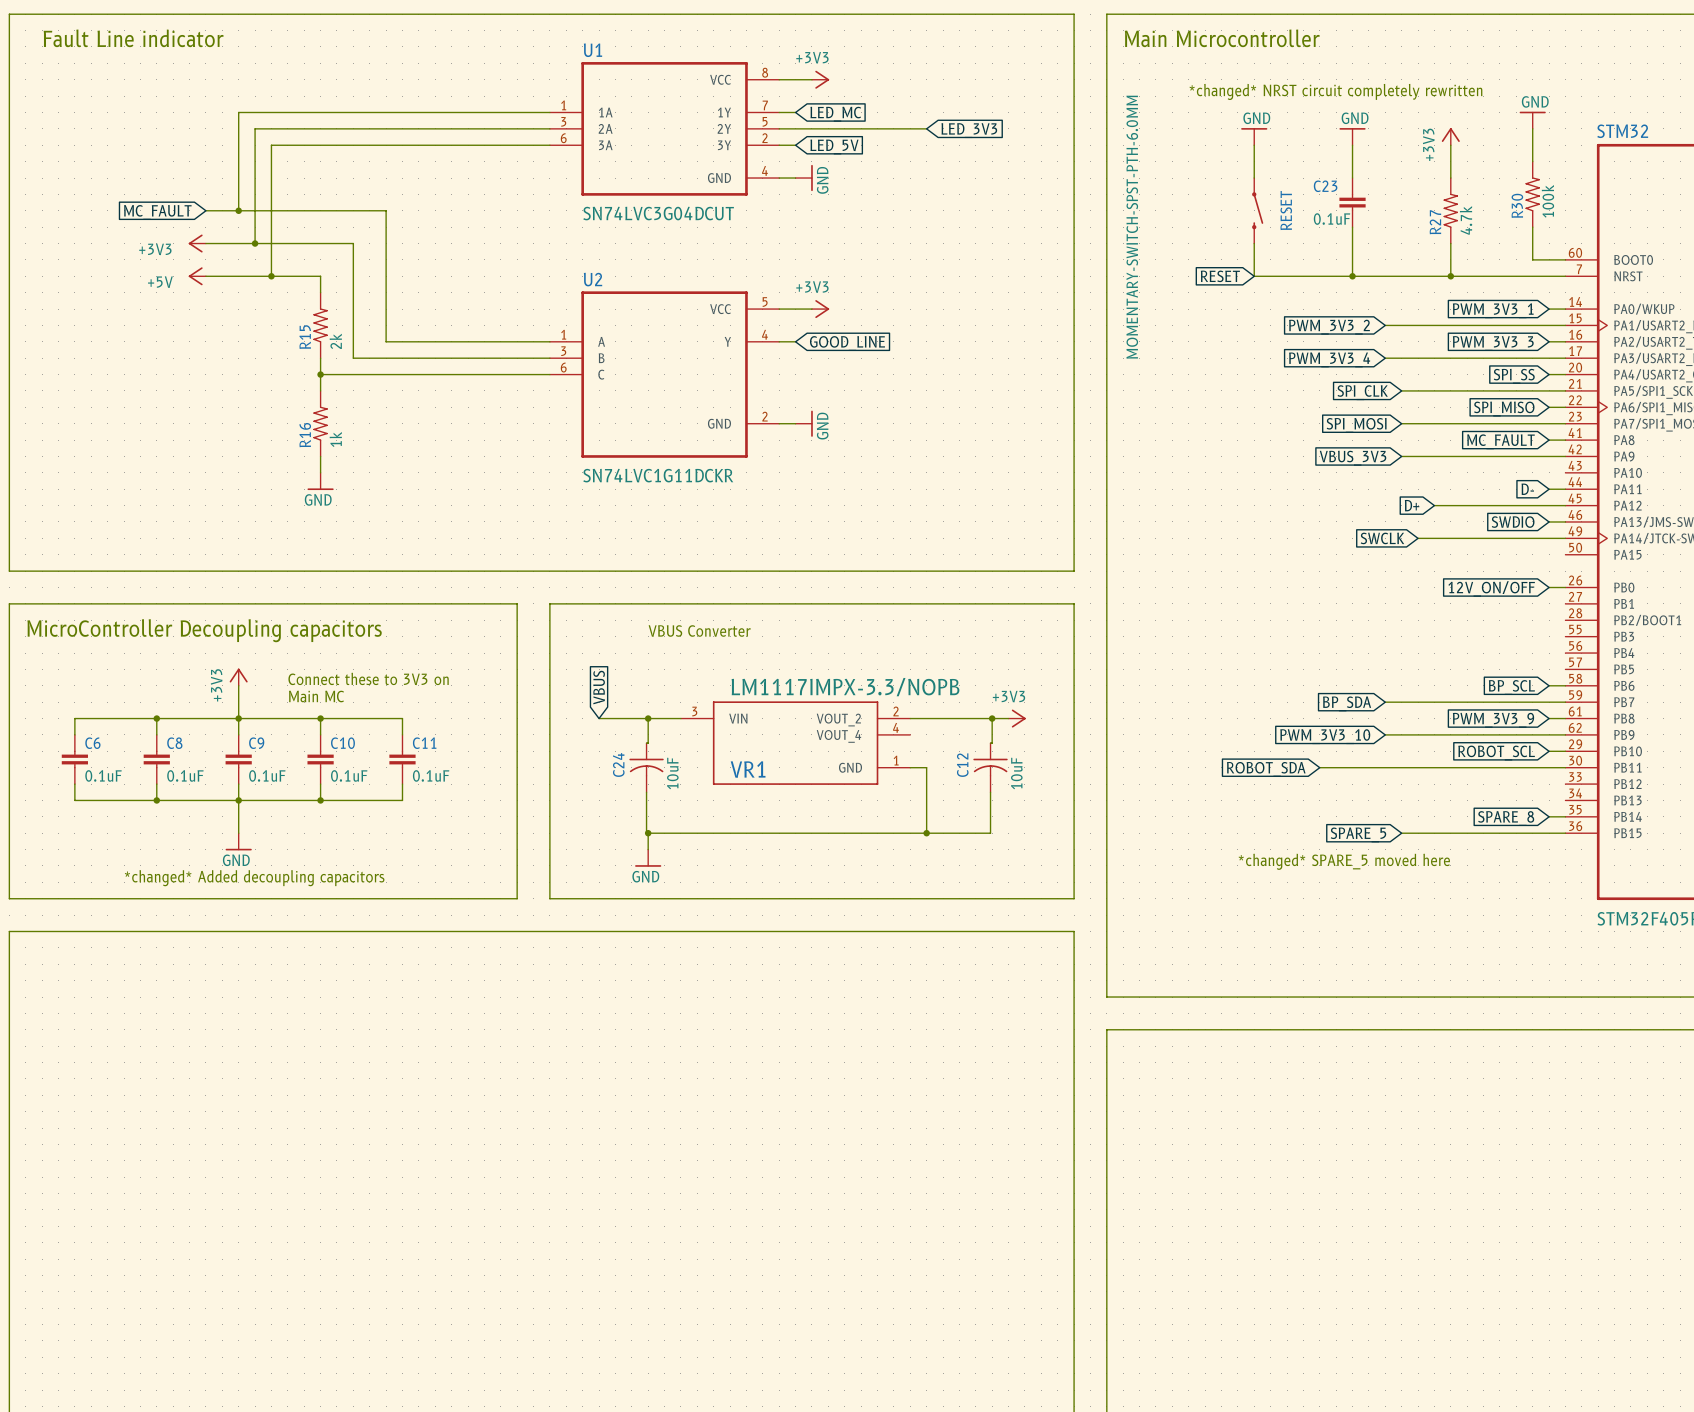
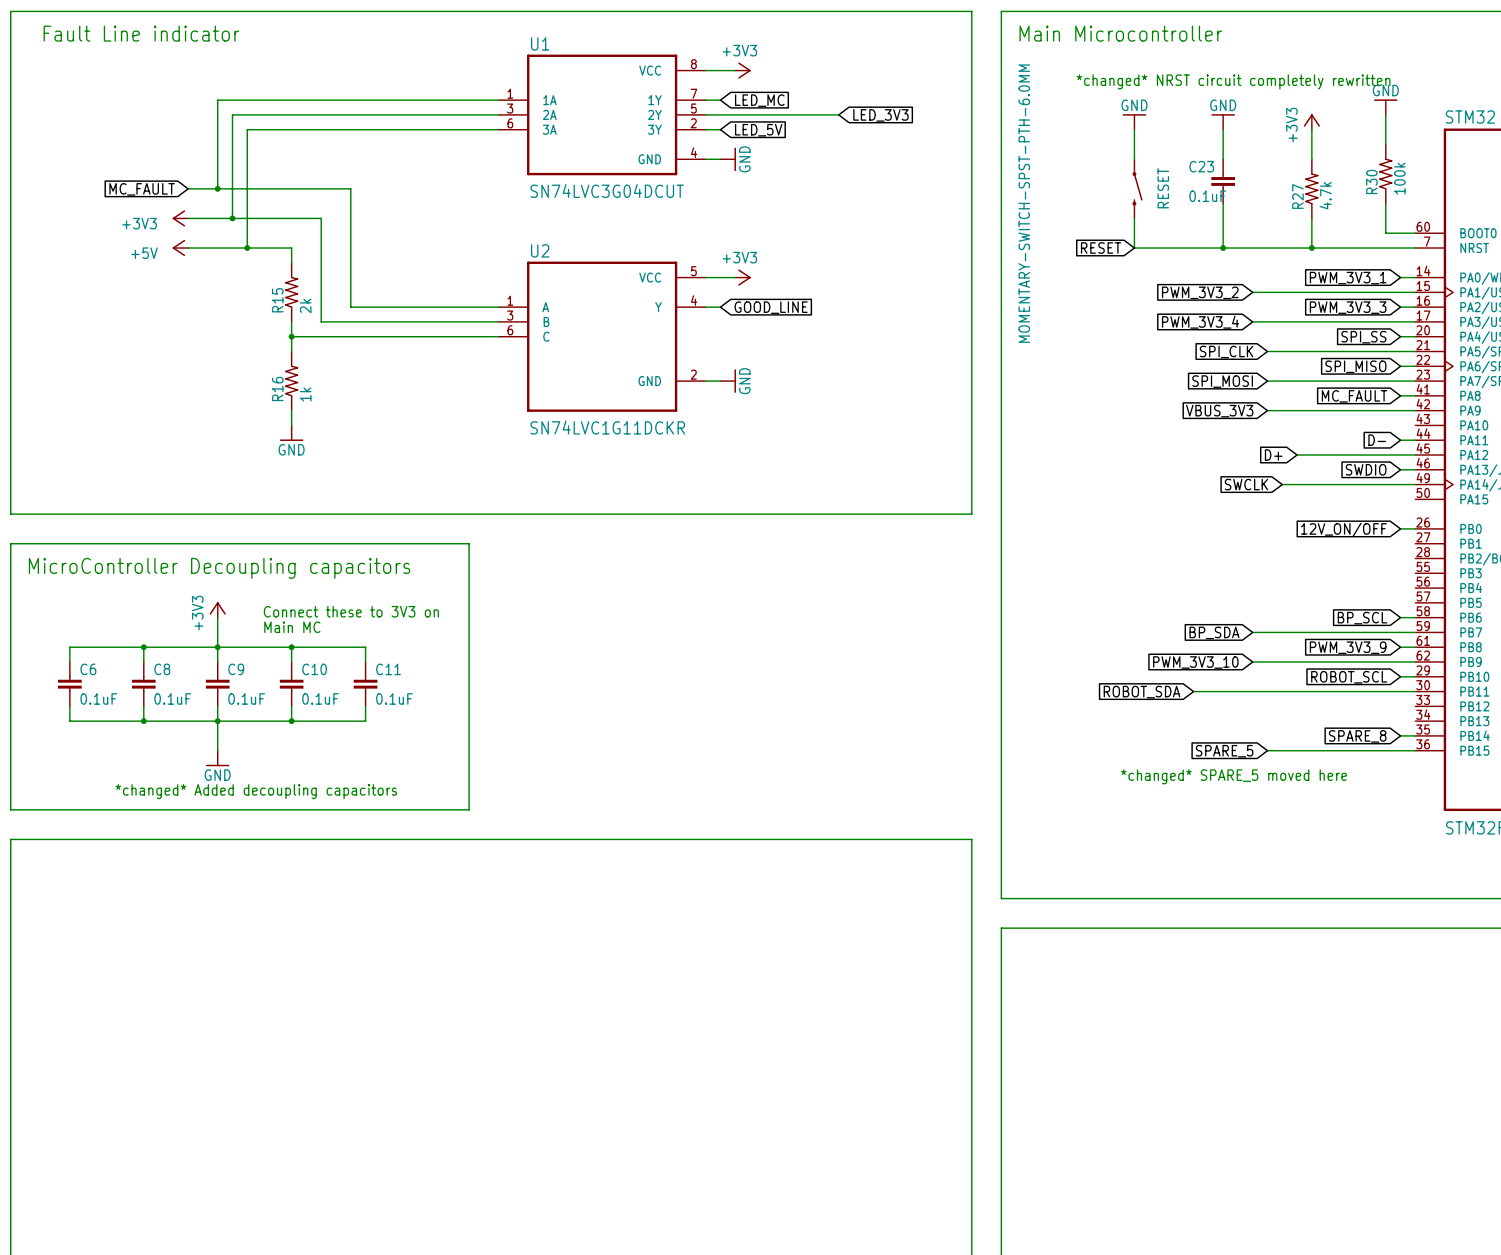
wire: (549, 603) (1074, 603) (1074, 898) (549, 898) (549, 603) -> none
text: VBUS Converter (699, 630) -> none
global label: VBUS (599, 687) -> none
wire: (599, 718) (680, 718) -> none
wire: (648, 718) (648, 743) (646, 743) -> none
junction: (648, 718) -> none
wire: (910, 718) (1008, 718) -> none
wire: (992, 718) (992, 743) (990, 743) -> none
junction: (992, 718) -> none
power symbol: +3V3 (1017, 718) -> none
VR1: LM1117IMPX-3.3/NOPB (795, 743) -> none
C24: 10uF (646, 767) -> none
wire: (910, 767) (926, 767) (926, 833) -> none
C12: 10uF (990, 767) -> none
wire: (646, 792) (646, 833) (990, 833) (990, 792) -> none
wire: (648, 833) (648, 849) -> none
junction: (648, 833) -> none
junction: (926, 833) -> none
power symbol: GND (648, 858) -> none

